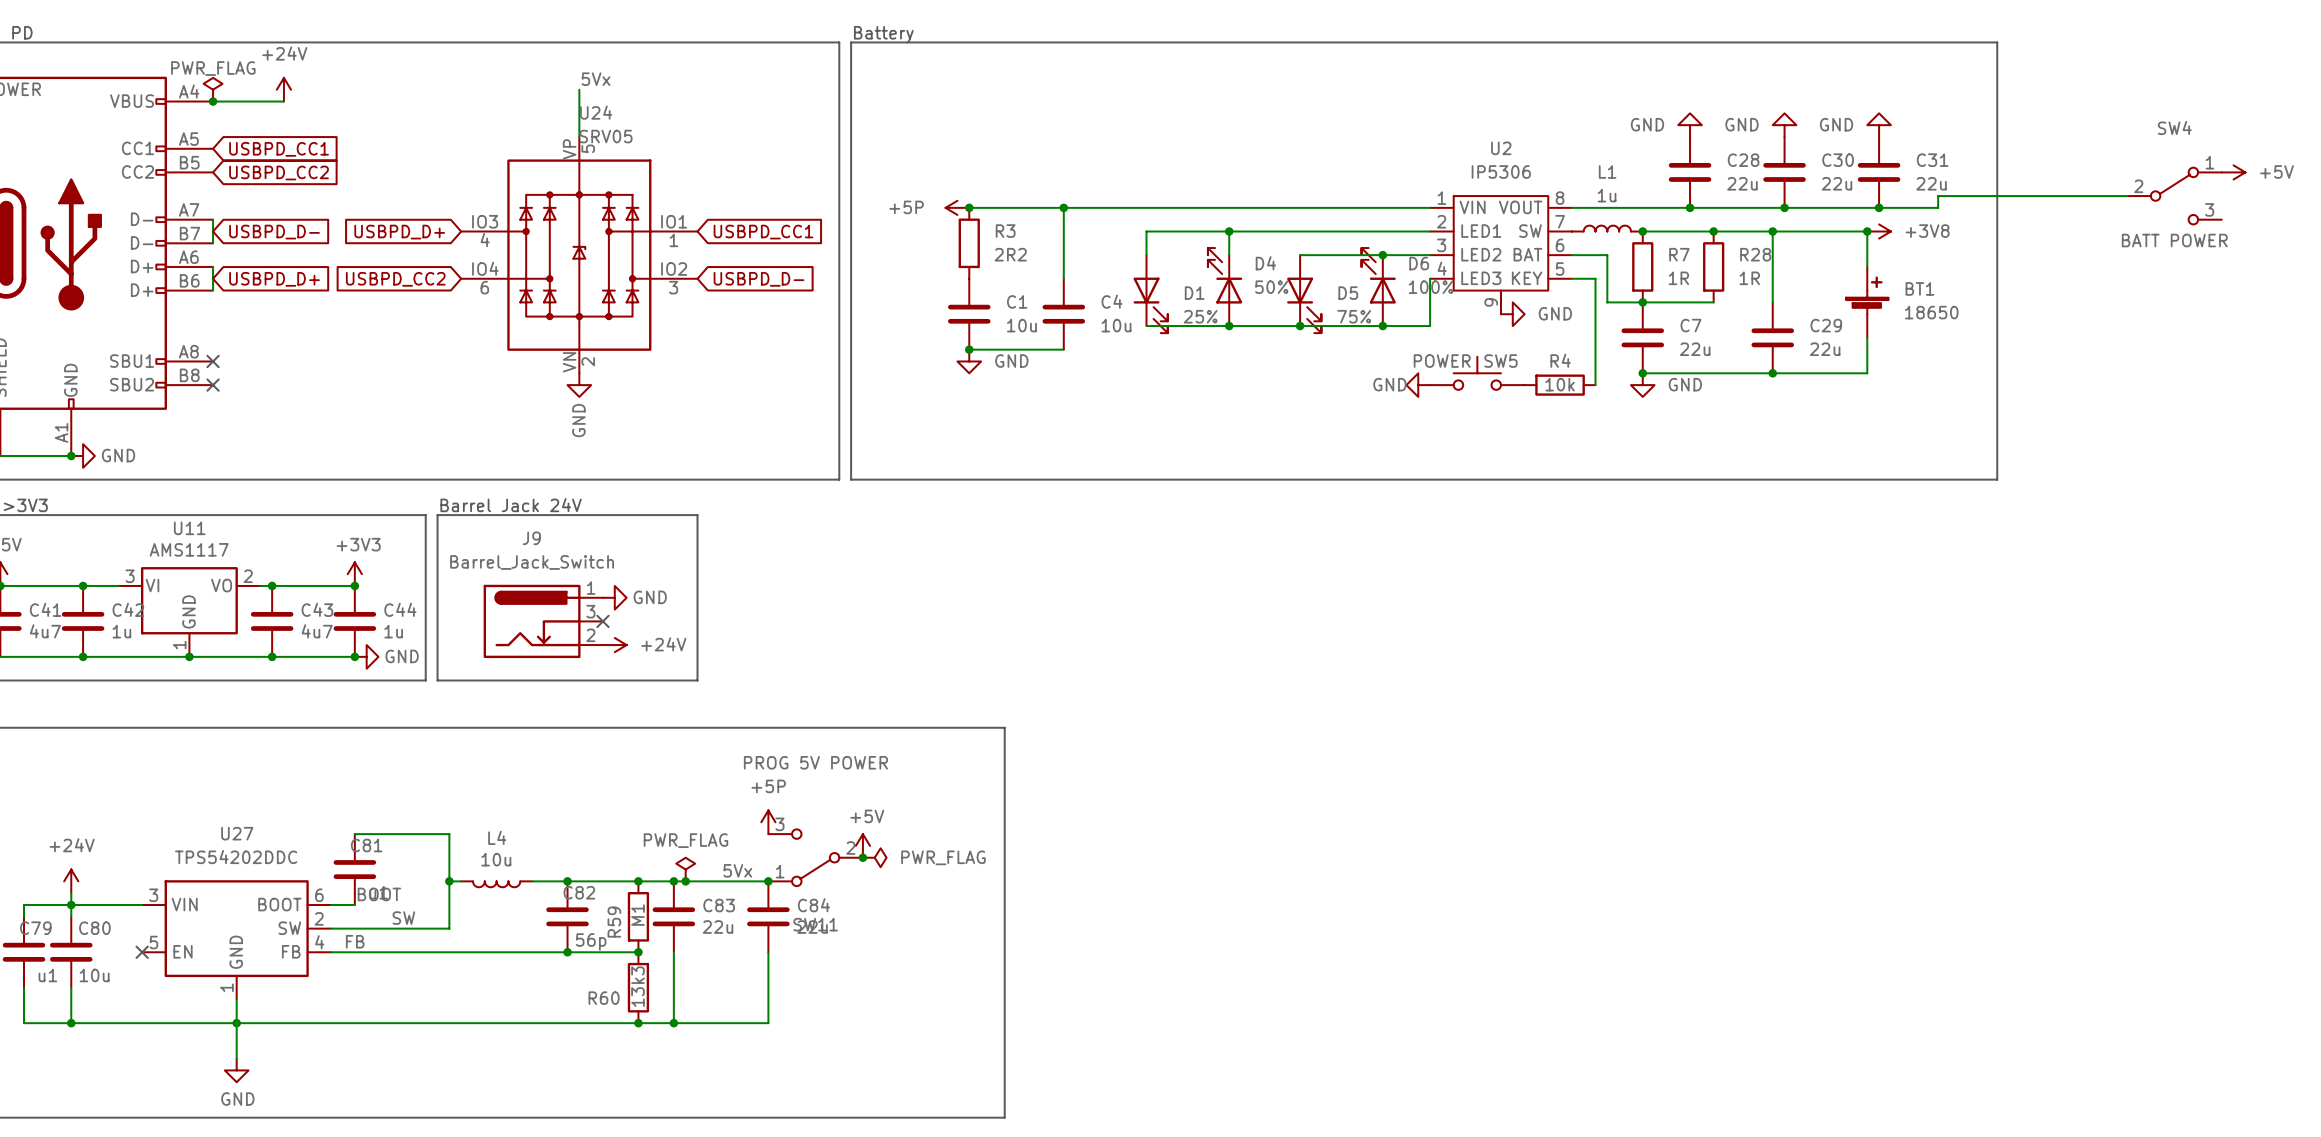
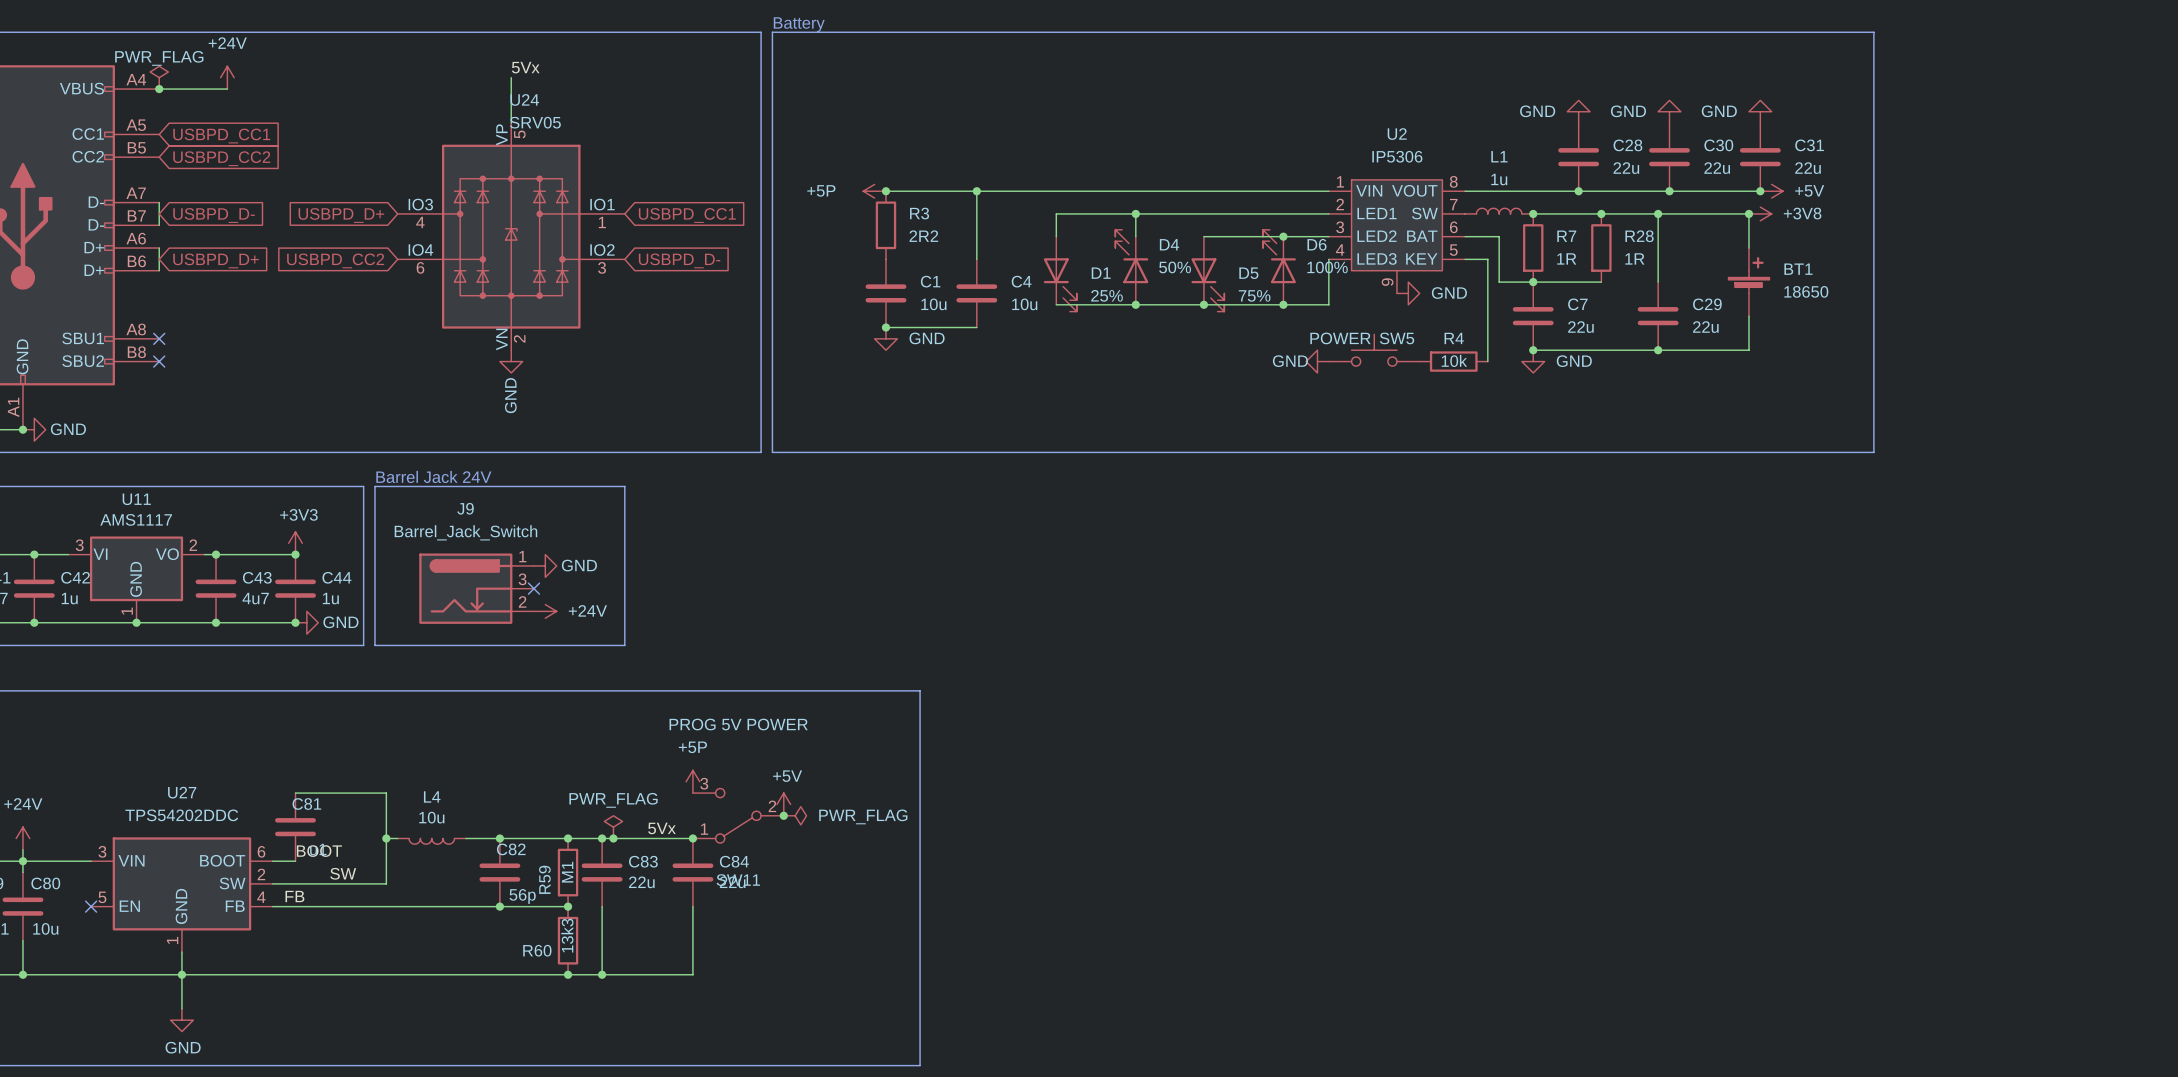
power symbol: +5V (2233, 172) -> none
wire: (2127, 196) (1938, 196) (1938, 207) (1879, 207) -> none
SW4: BATT POWER (2174, 196) -> none
power symbol: none -> +5V (1771, 191)

